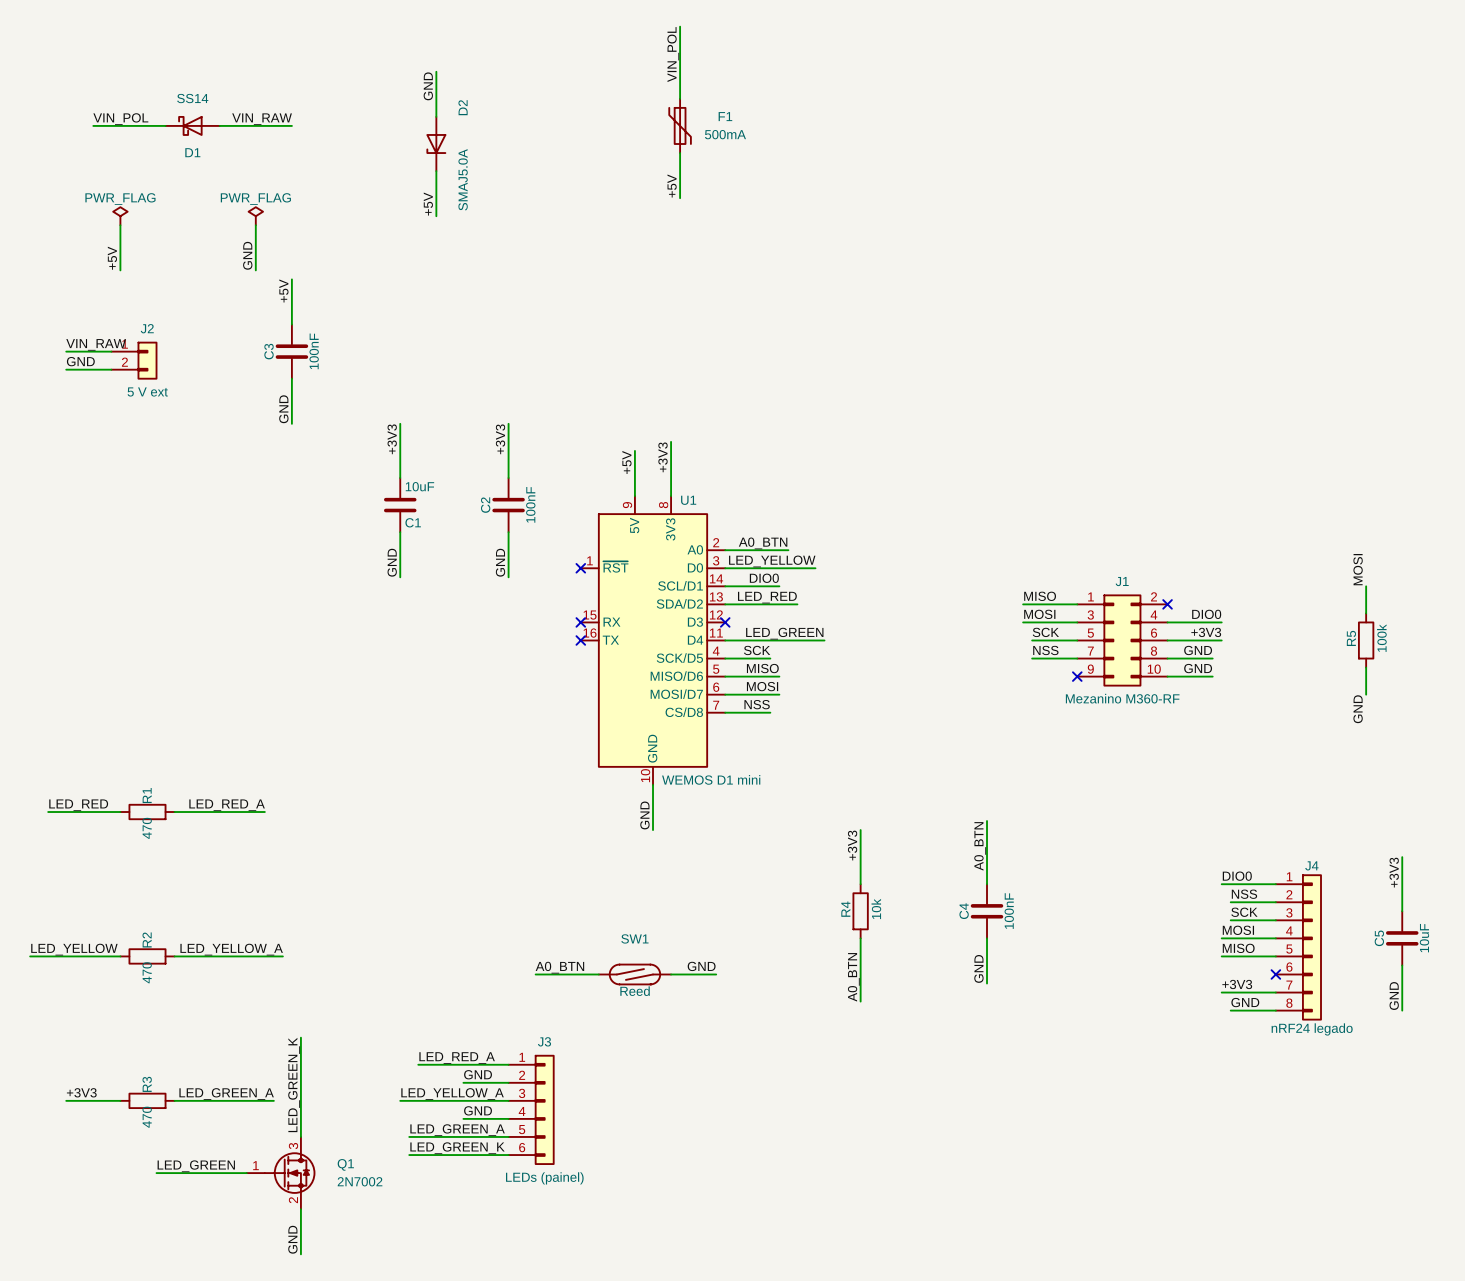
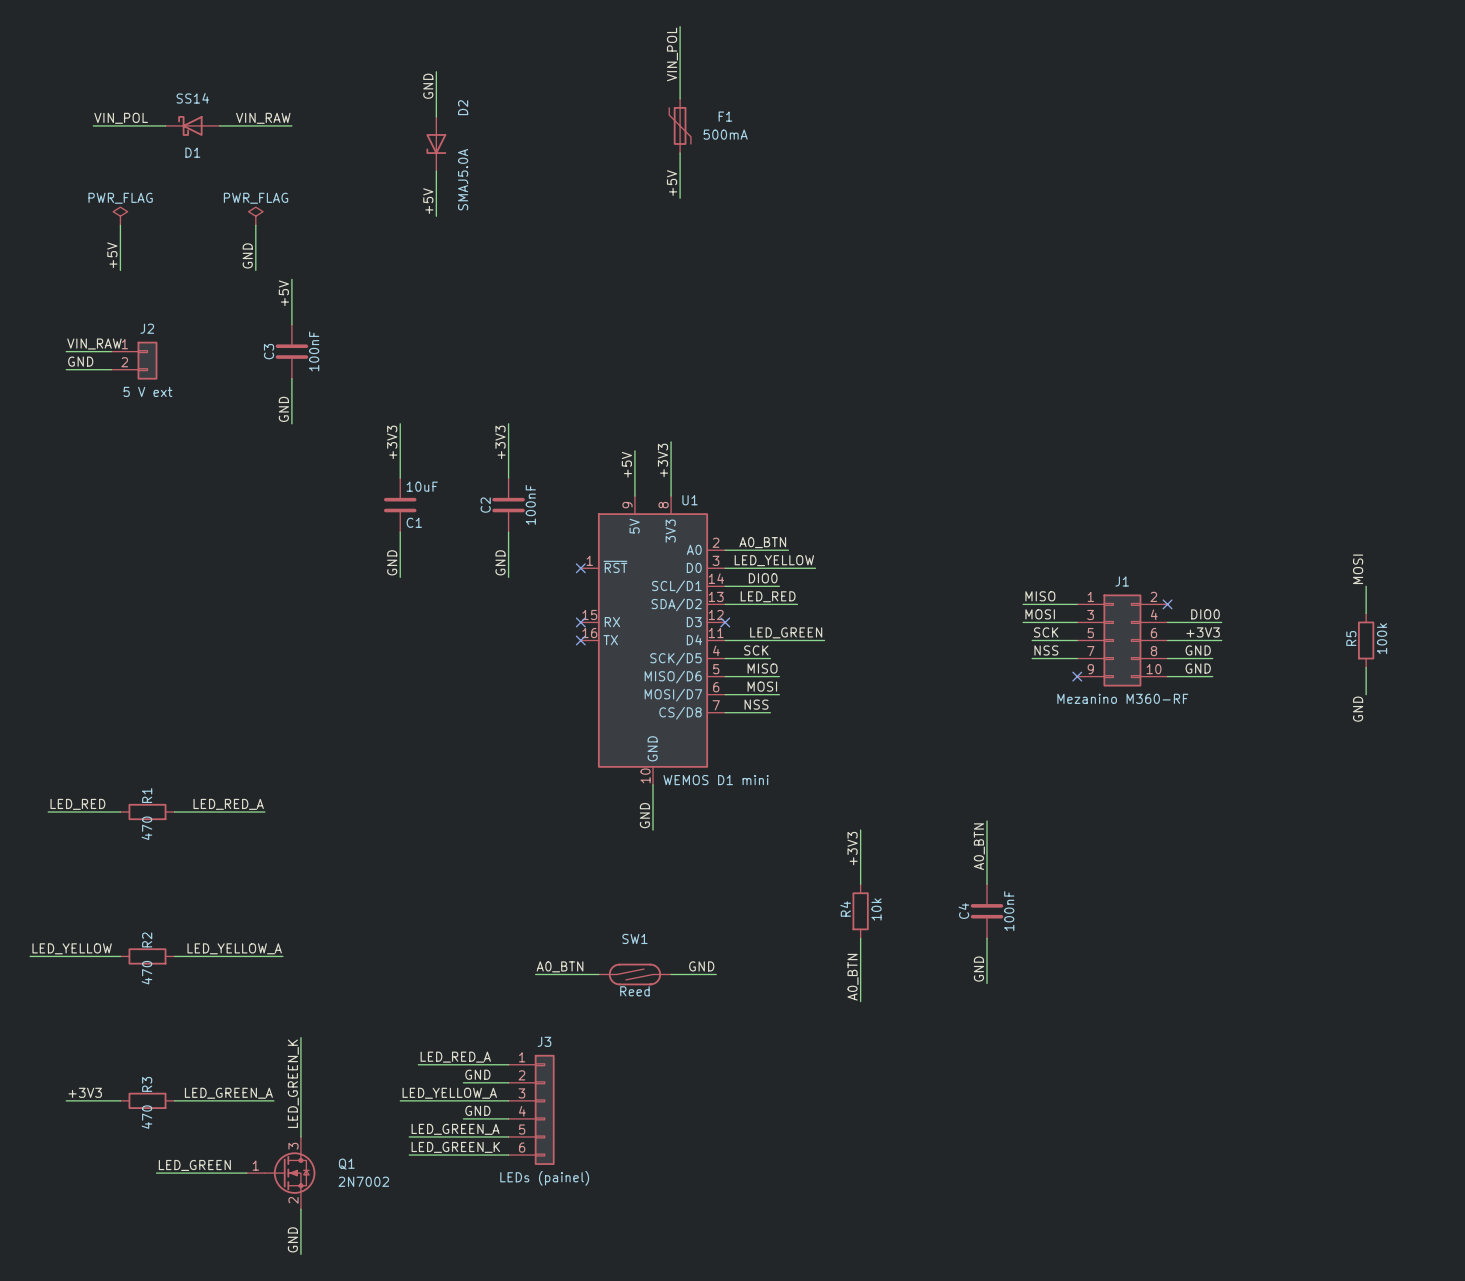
wire: (1402, 857) (1402, 911) -> none
label: +3V3 (1394, 872) -> none
label: DIO0 (1237, 876) -> none
wire: (1221, 884) (1275, 884) -> none
label: NSS (1244, 894) -> none
wire: (1230, 902) (1275, 902) -> none
label: SCK (1244, 912) -> none
wire: (1230, 920) (1275, 920) -> none
label: MOSI (1238, 930) -> none
wire: (1221, 938) (1275, 938) -> none
C5: 10uF (1402, 938) -> none
J4: nRF24 legado (1298, 947) -> none
label: MISO (1238, 948) -> none
wire: (1221, 956) (1275, 956) -> none
wire: (1402, 965) (1402, 1010) -> none
no-connect mark: (1275, 974) -> none
label: +3V3 (1237, 984) -> none
wire: (1221, 992) (1275, 992) -> none
label: GND (1394, 996) -> none
label: GND (1245, 1002) -> none
wire: (1230, 1010) (1275, 1010) -> none

